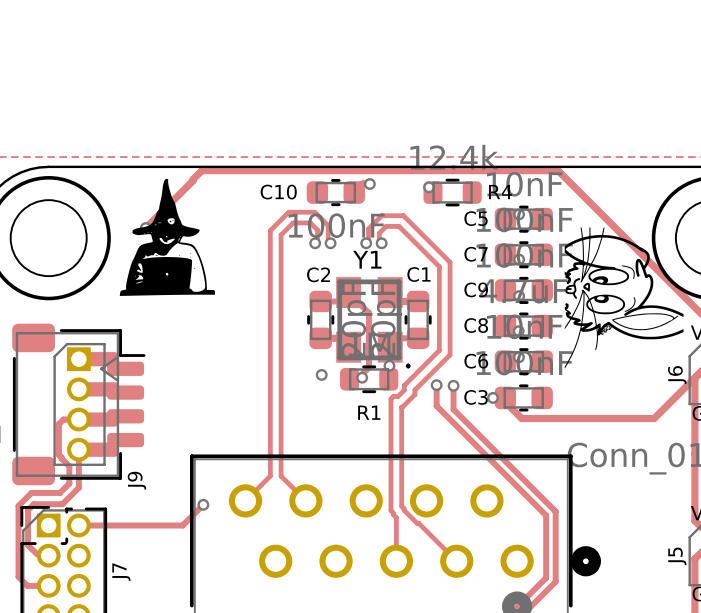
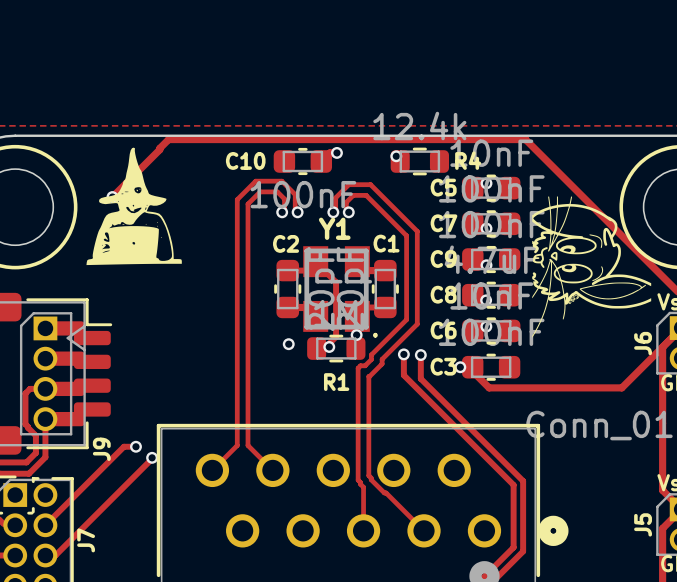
track: none -> (135, 446) (123, 446) (45, 525)
via: none -> (135, 446)
track: none -> (152, 457) (55, 555) (45, 555)
via: none -> (152, 457)
track: (203, 504) (182, 525) (78, 525) -> none
via: (203, 504) -> none

